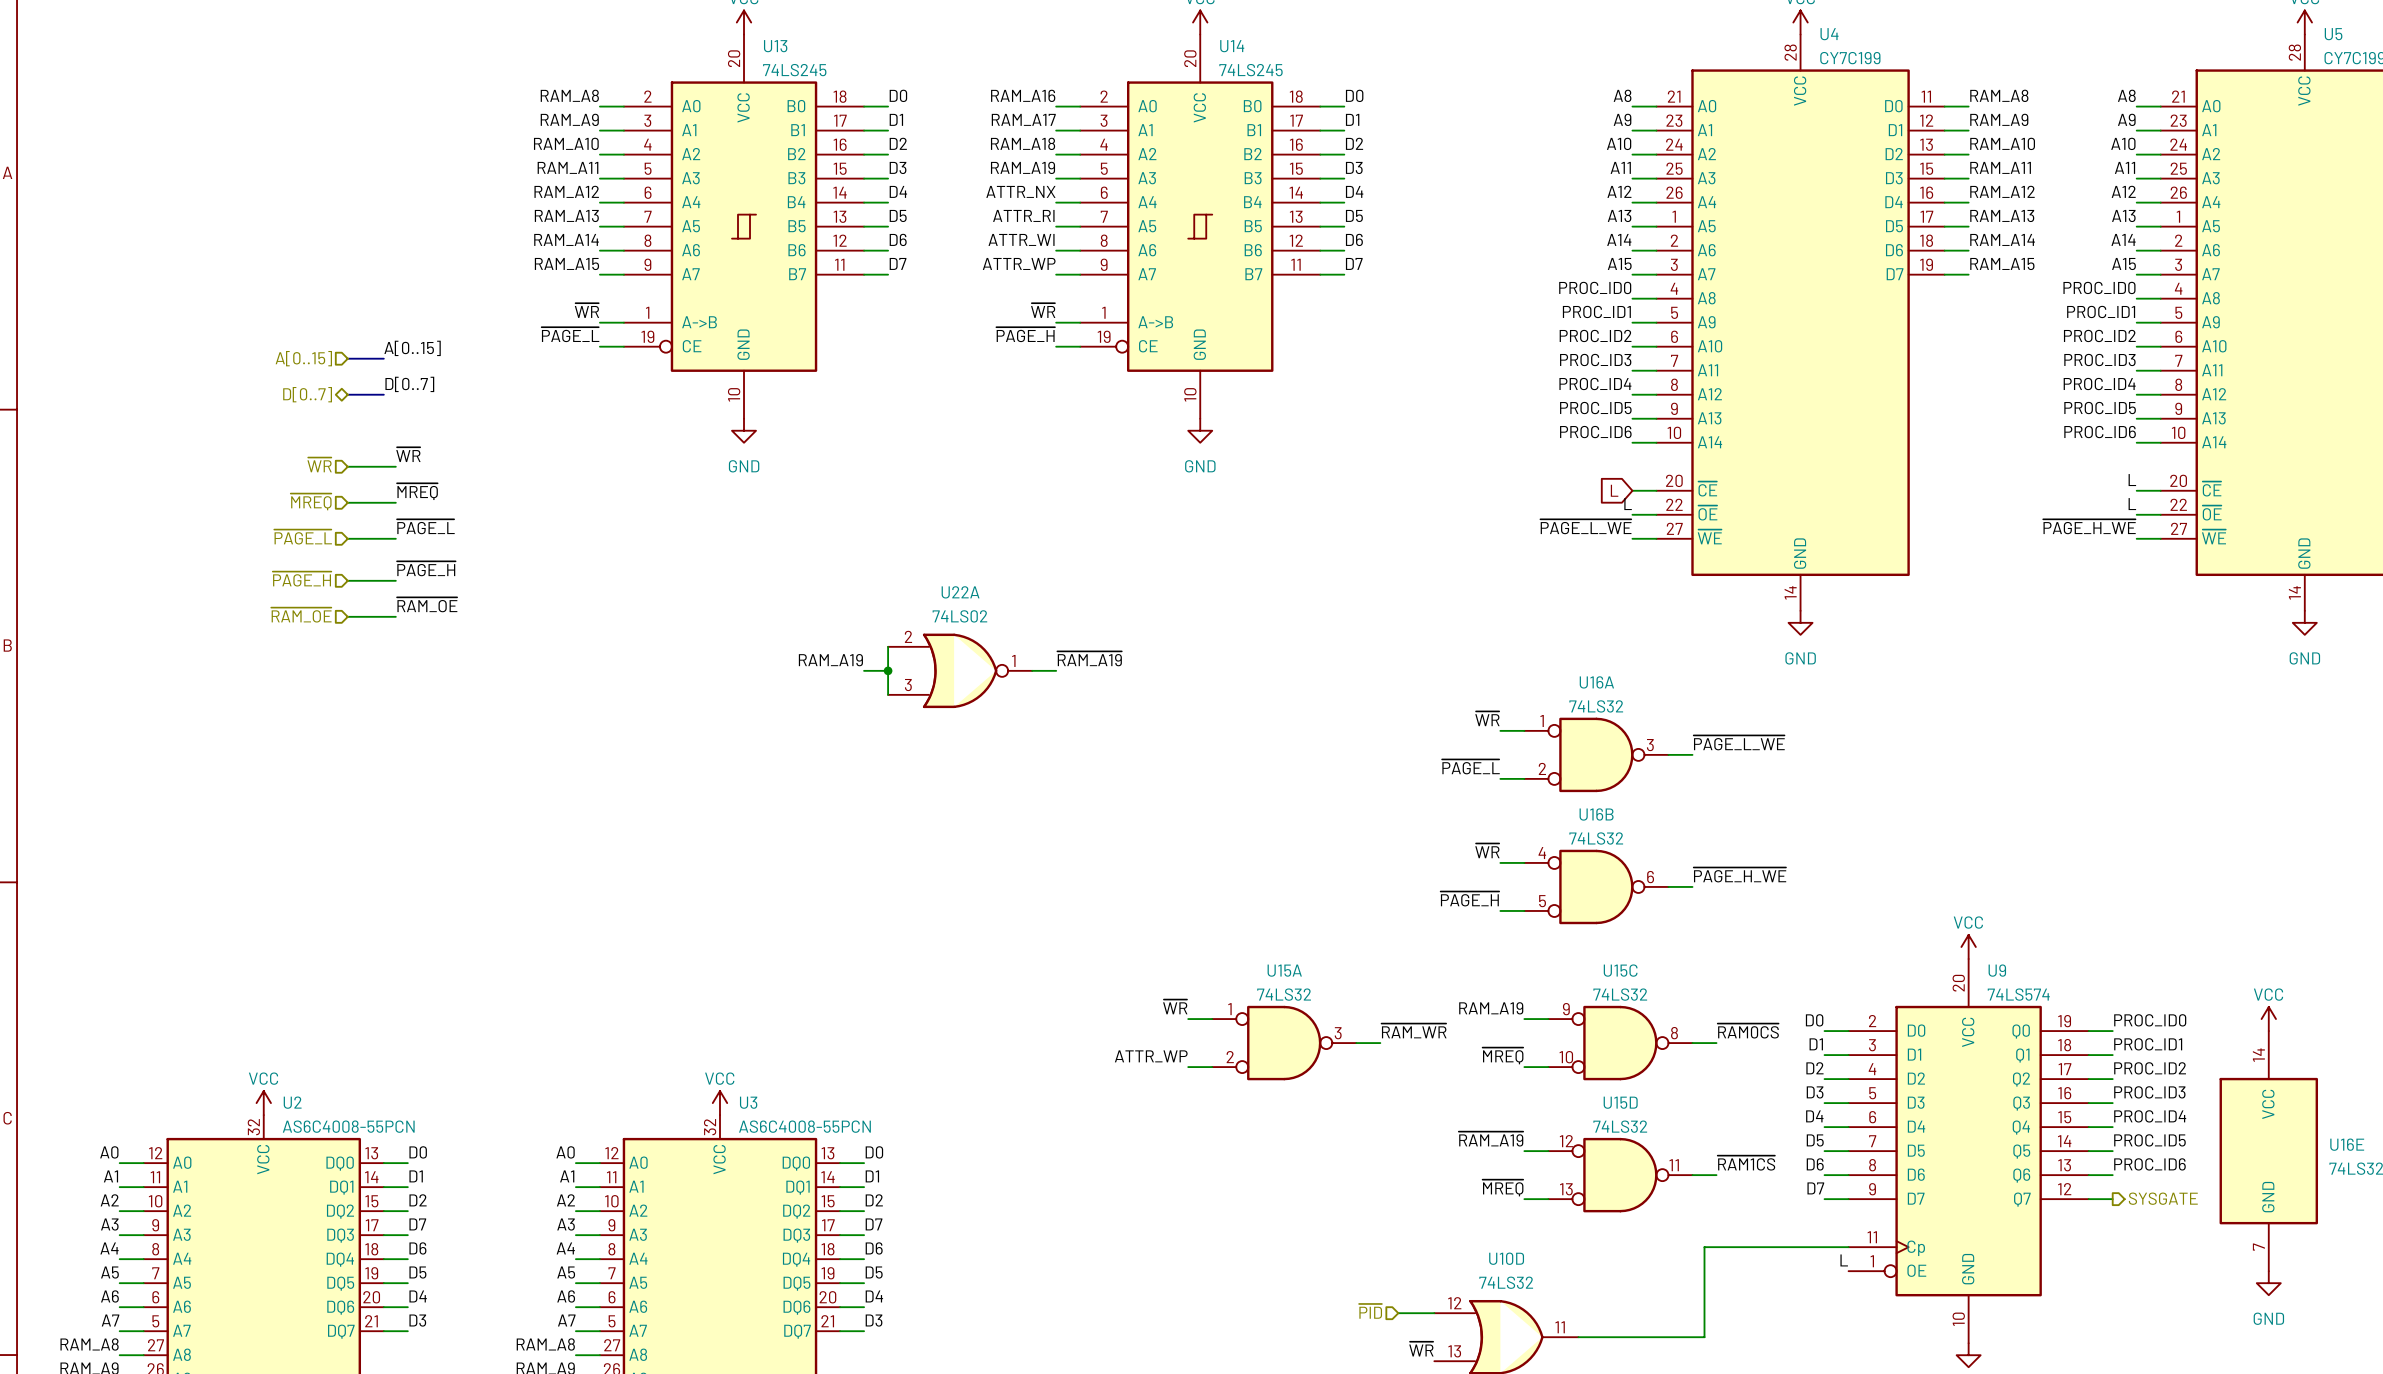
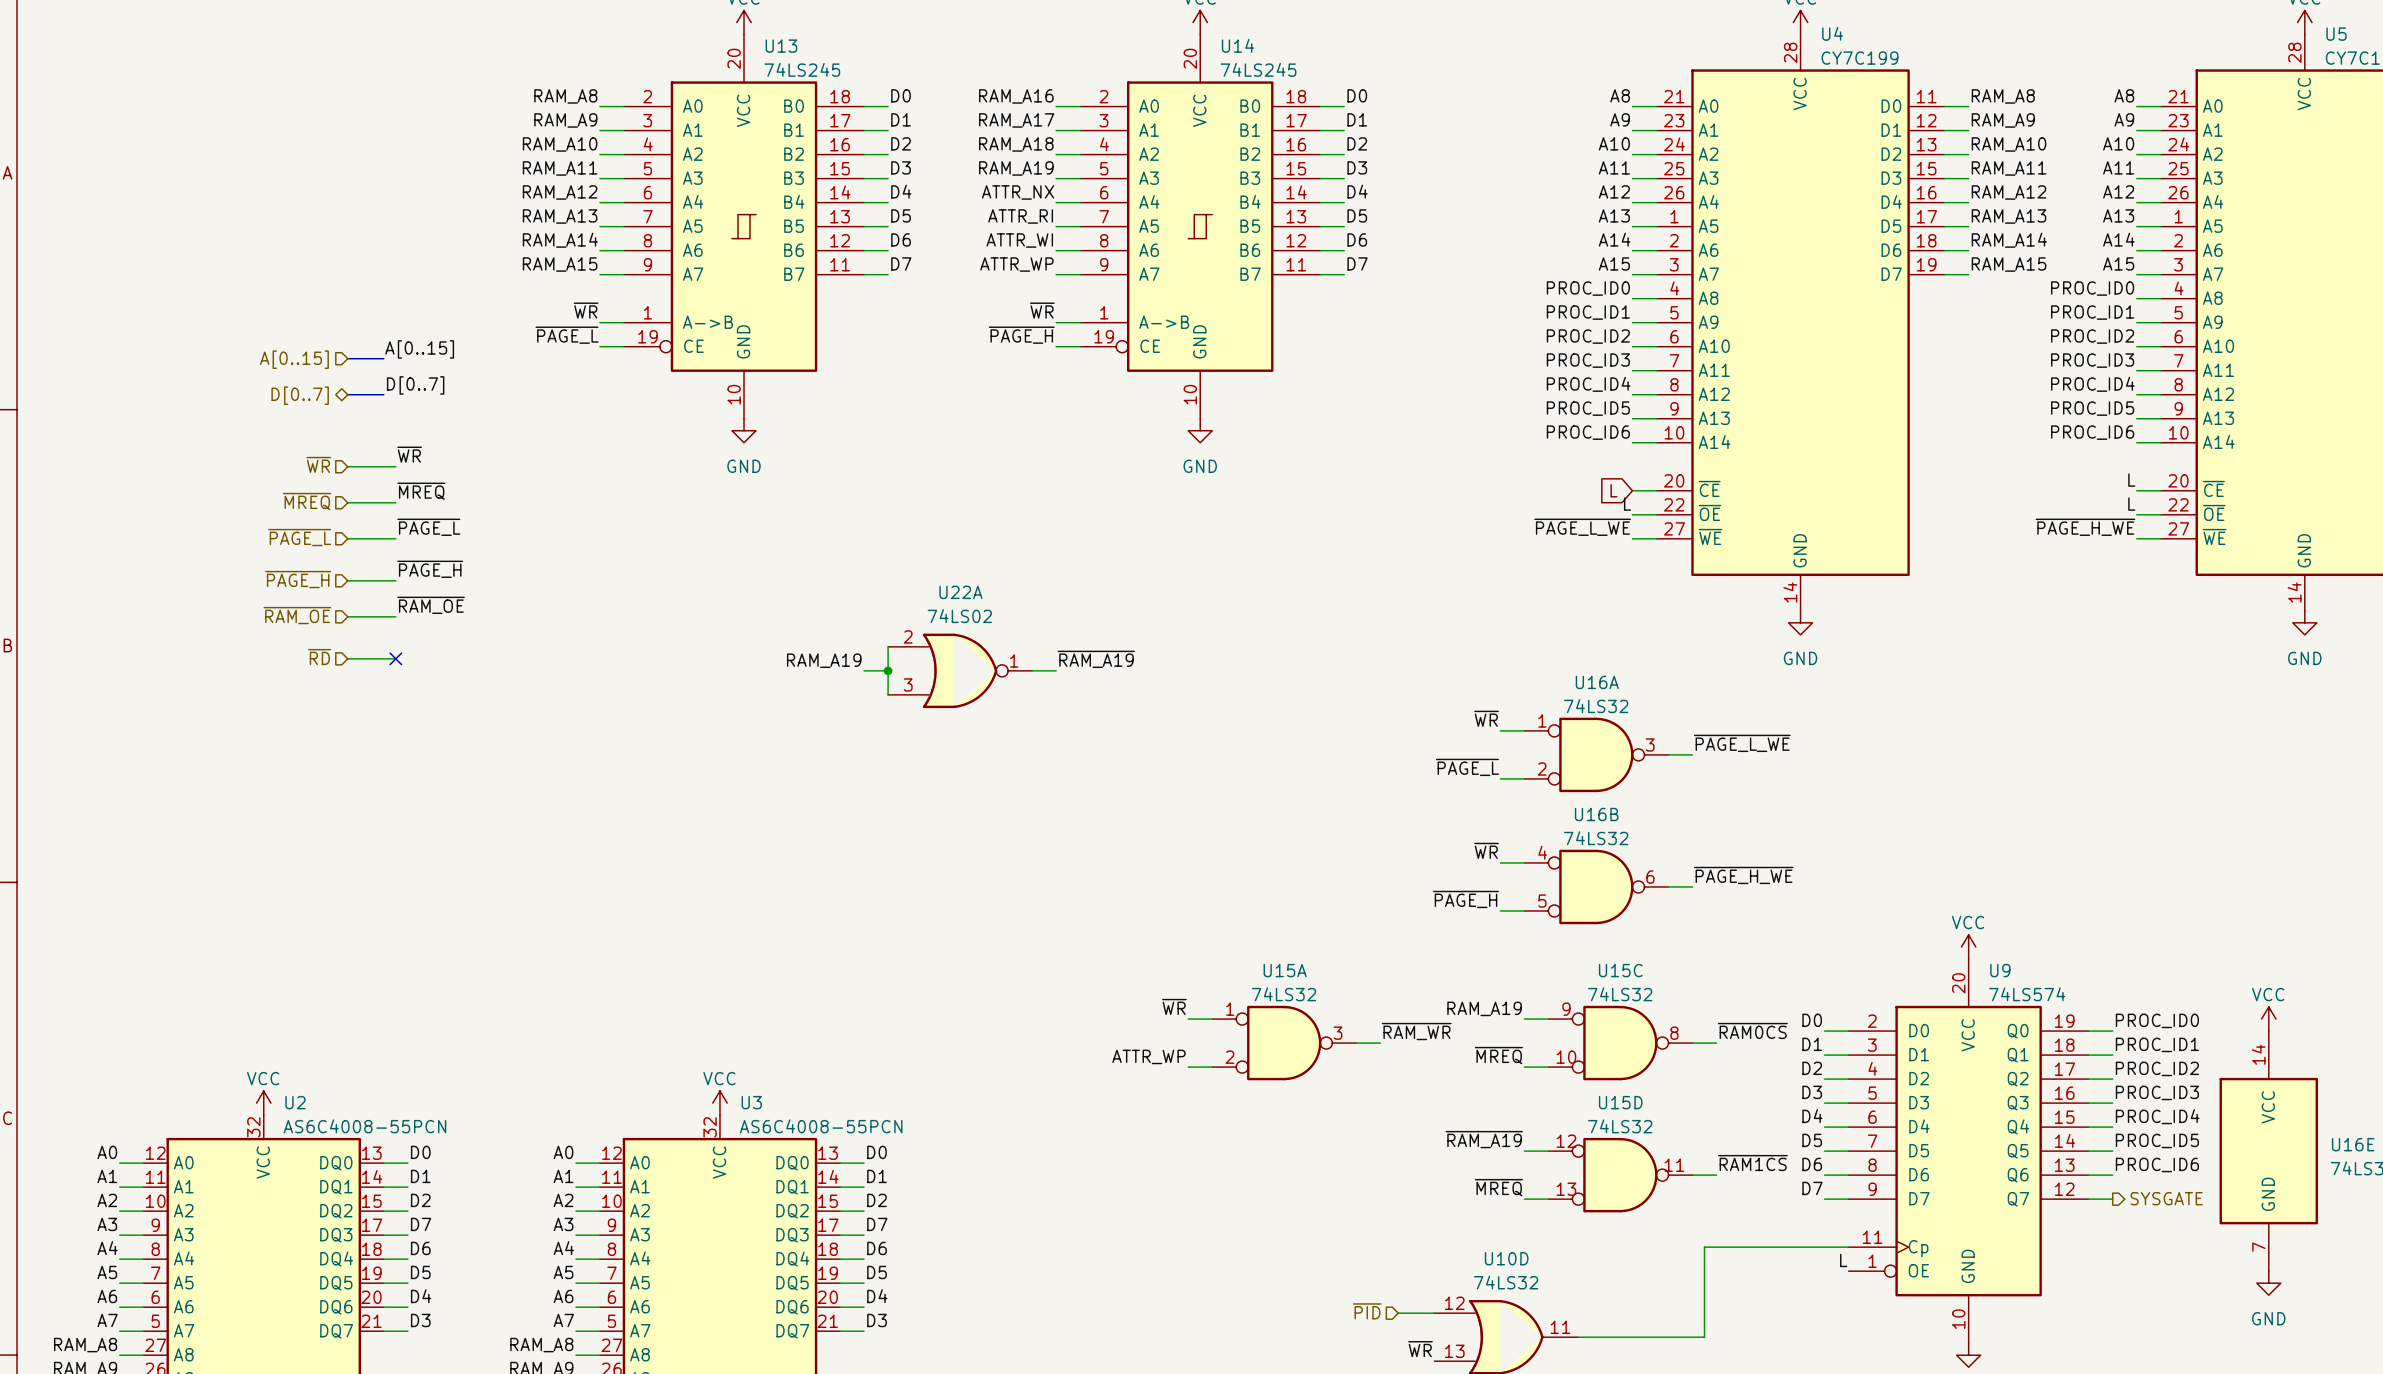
hierarchical label: none -> ~{RD} (319, 657)
wire: none -> (347, 658) (395, 658)
no-connect mark: none -> (395, 658)

